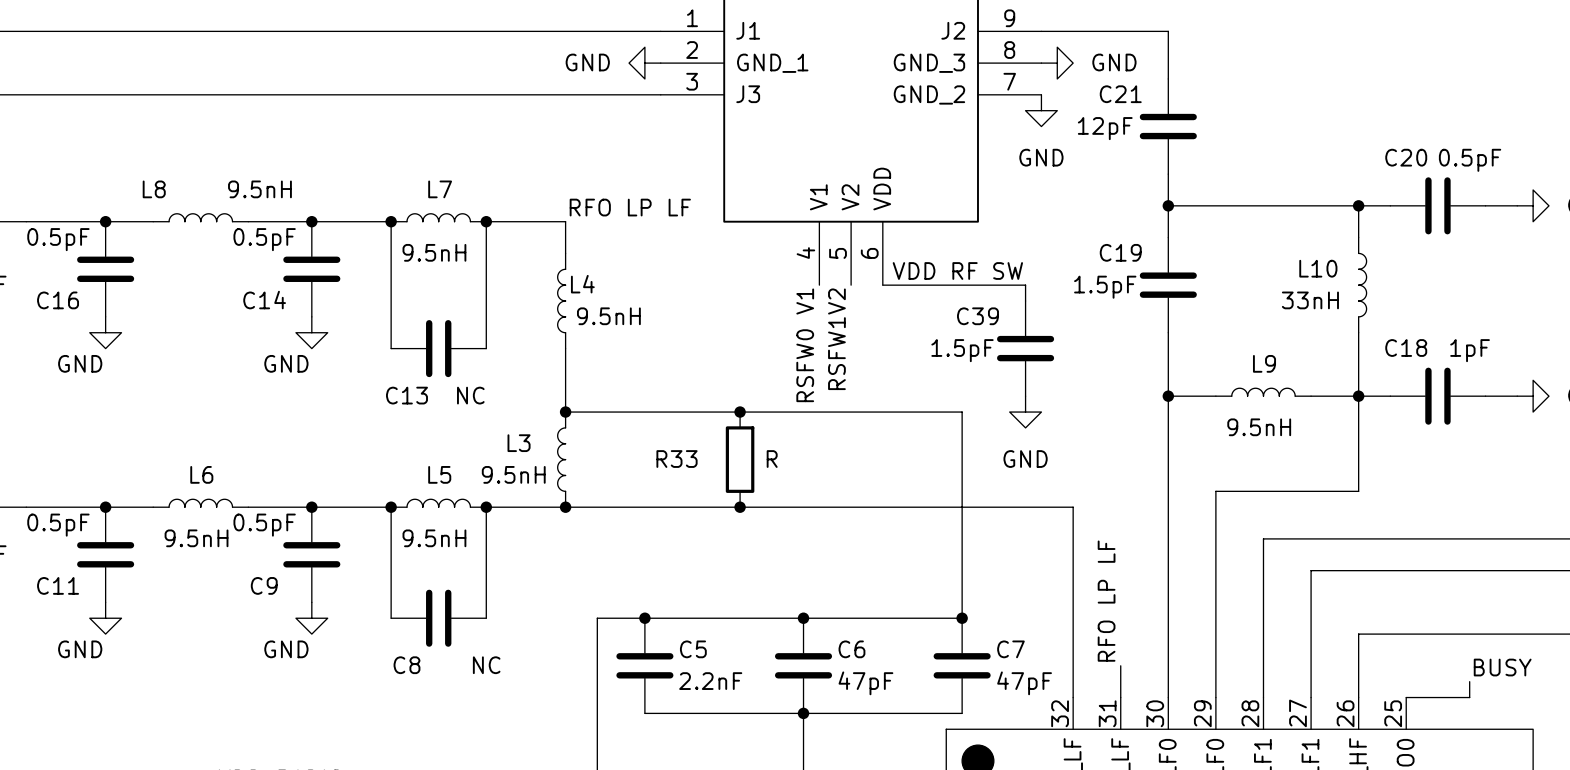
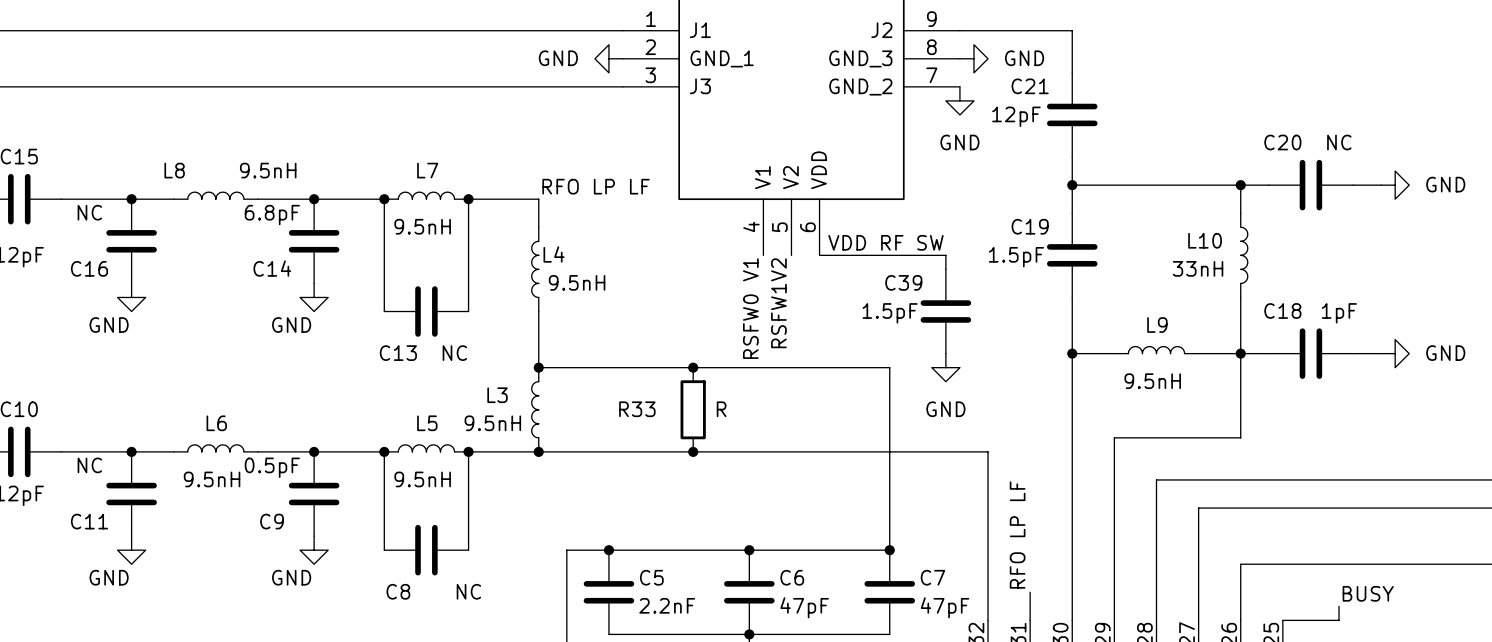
C20 value: 0.5pF (1470, 160) -> NC (1339, 142)
C16 value: 0.5pF (58, 239) -> NC (89, 212)
C14 value: 0.5pF (264, 239) -> 6.8pF (272, 215)
C11 value: 0.5pF (58, 525) -> NC (89, 465)

